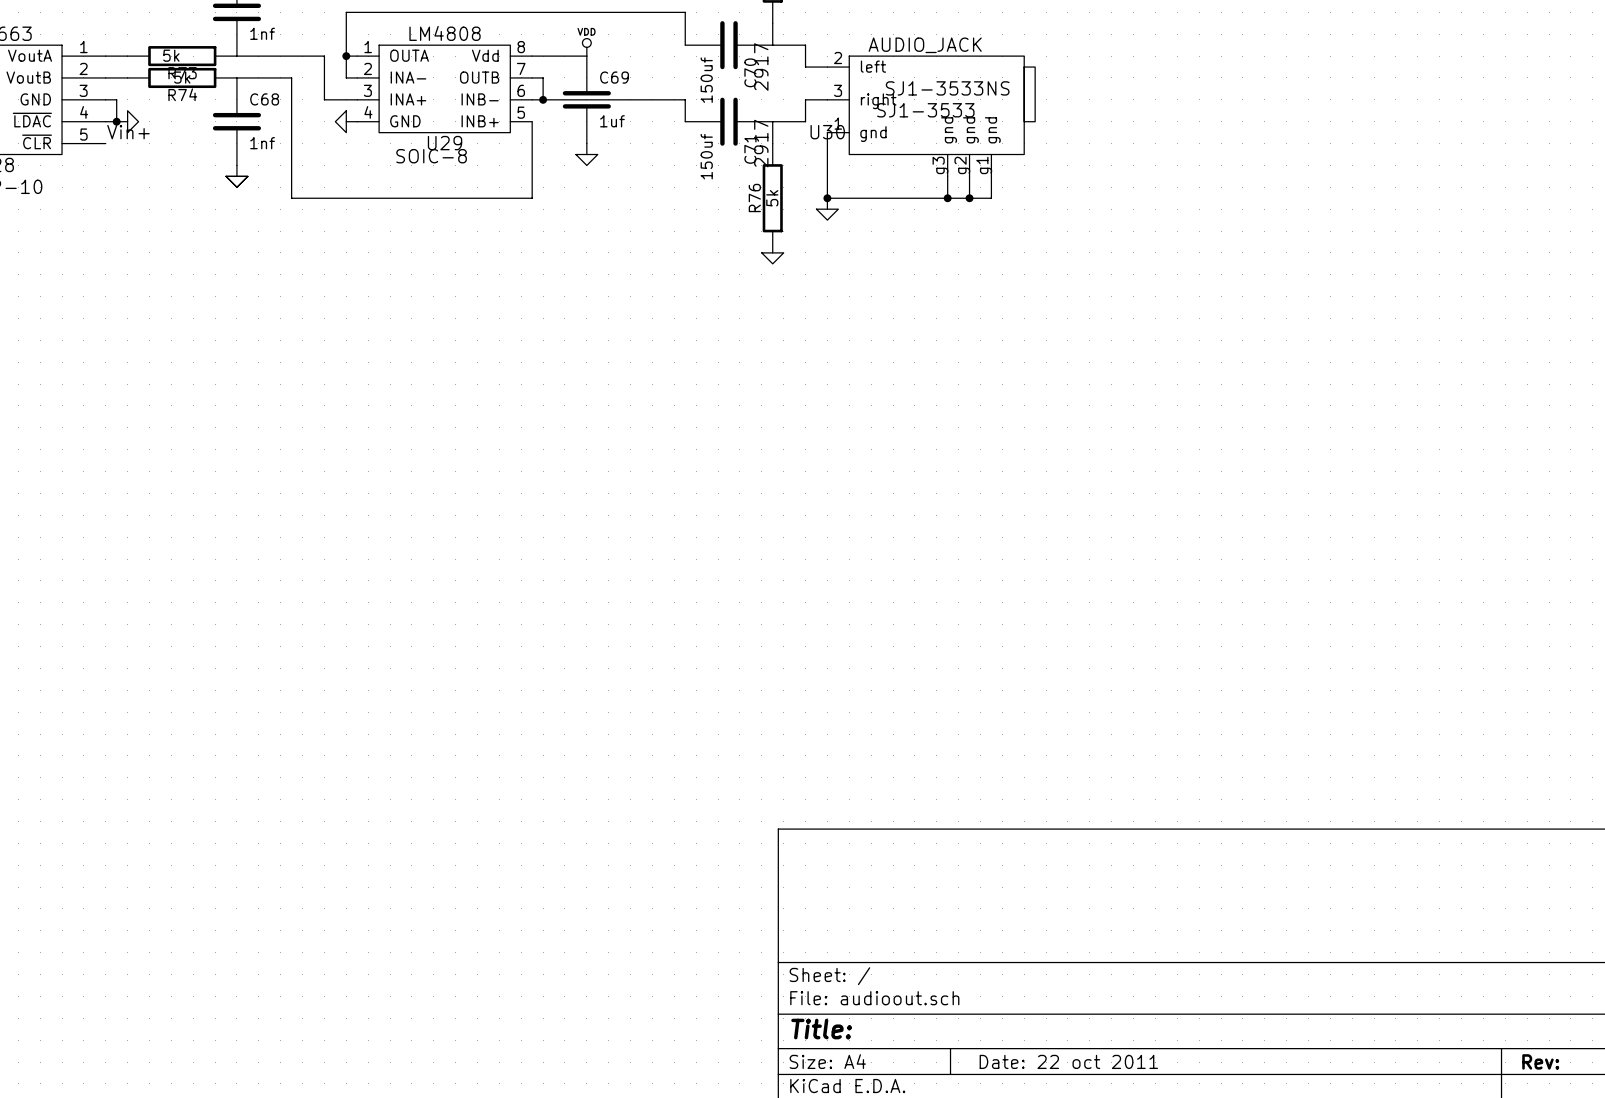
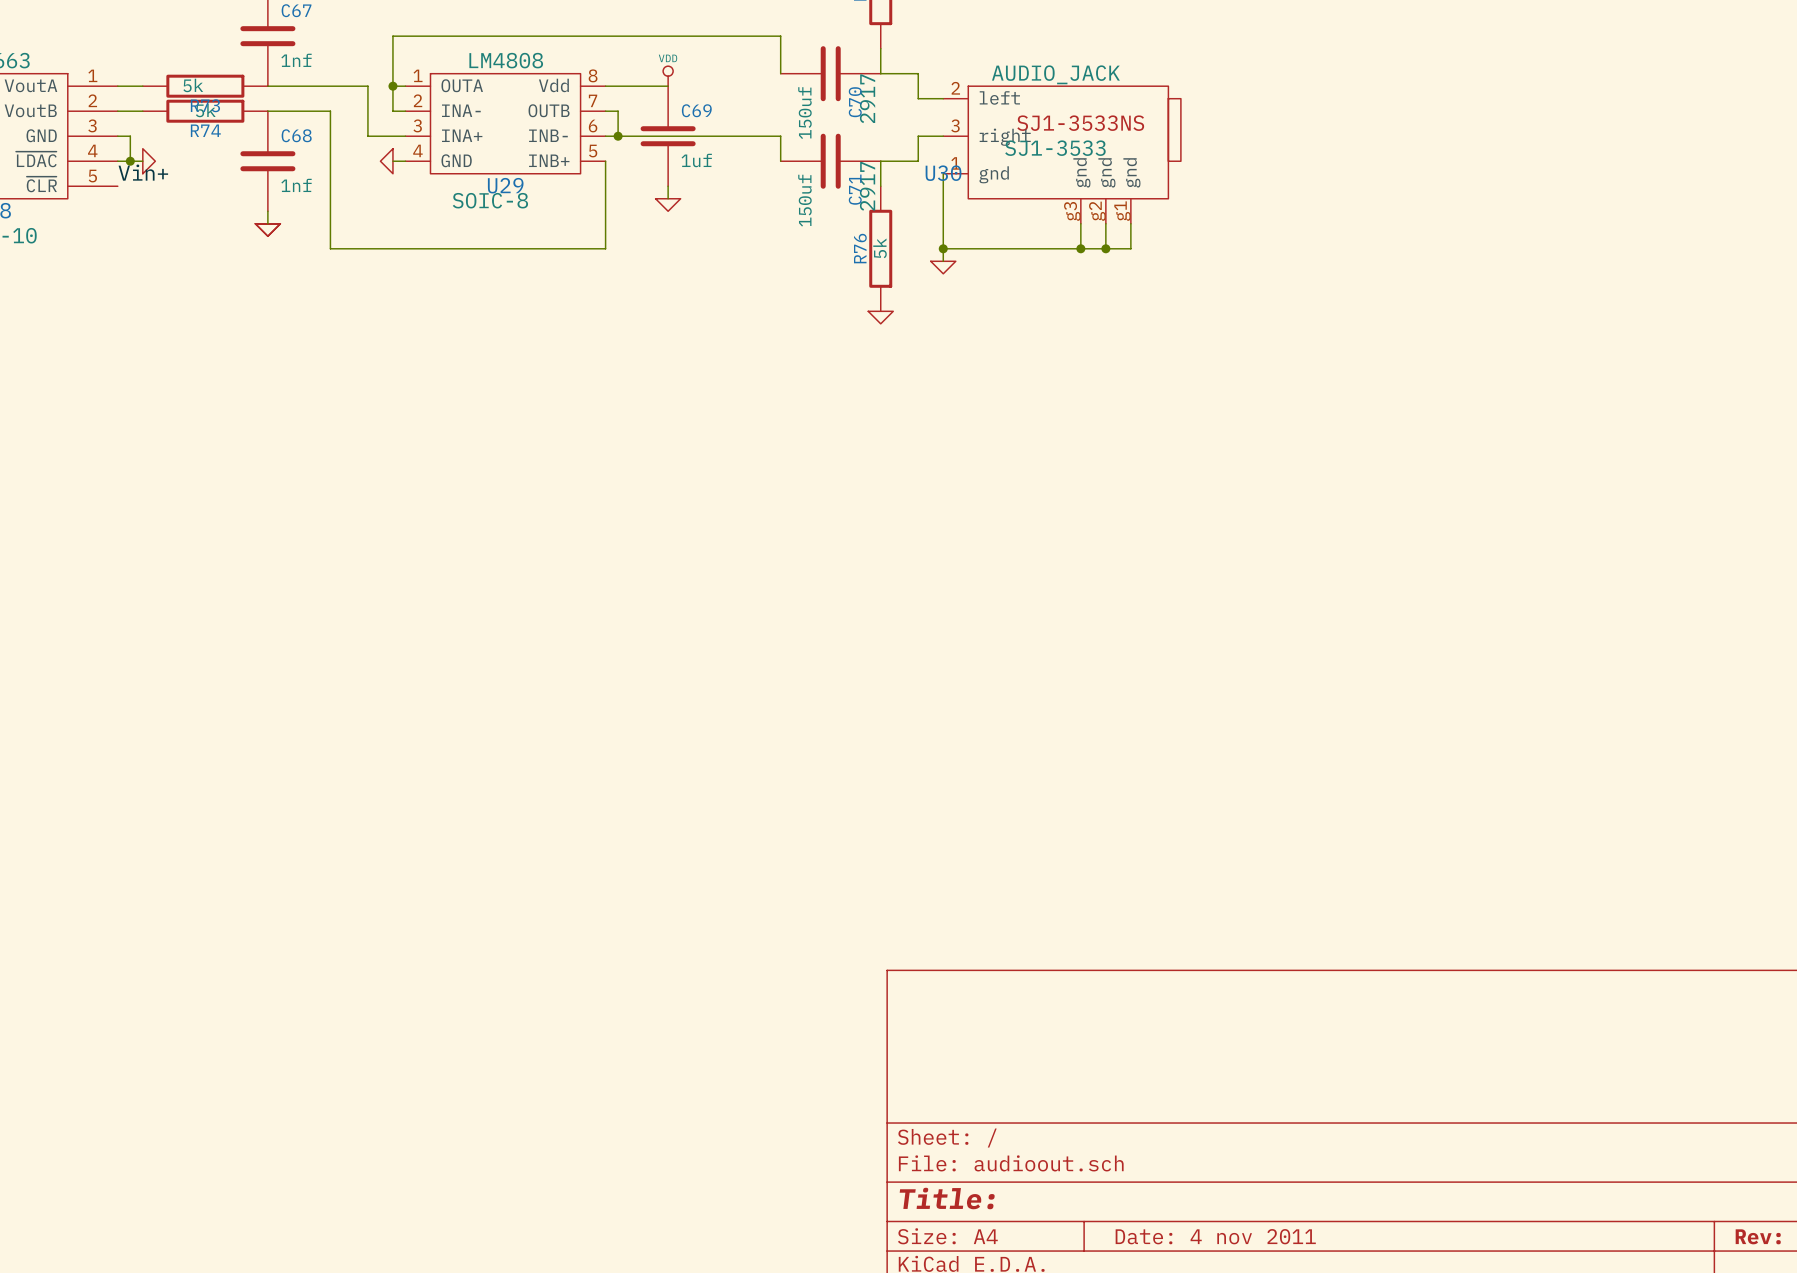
title block: Date: 22 oct 2011 (1068, 1061) -> Date: 4 nov 2011 (1215, 1236)

